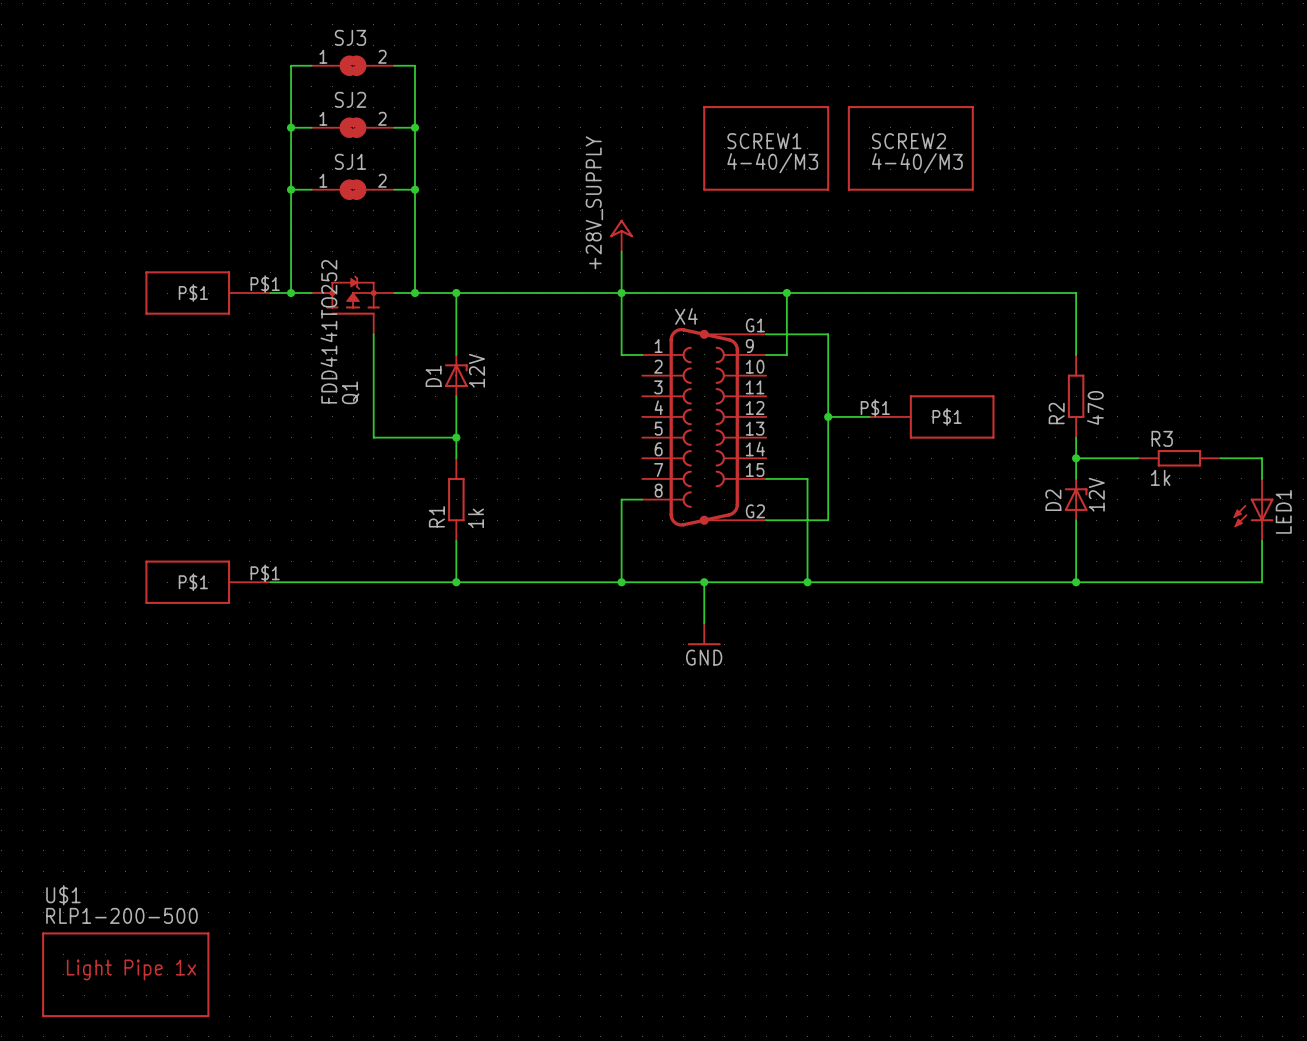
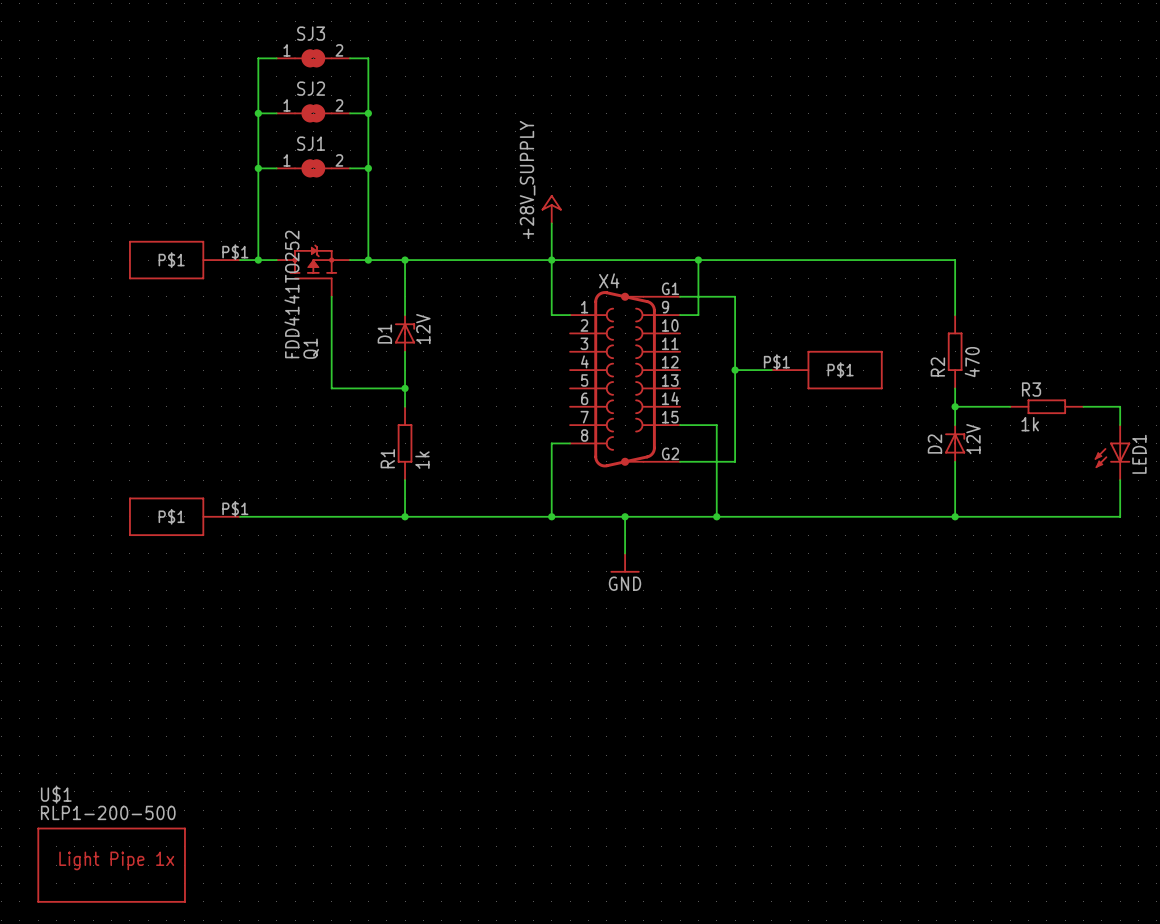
SCREW1: 4-40/M3 (766, 148) -> none
SCREW2: 4-40/M3 (910, 148) -> none

